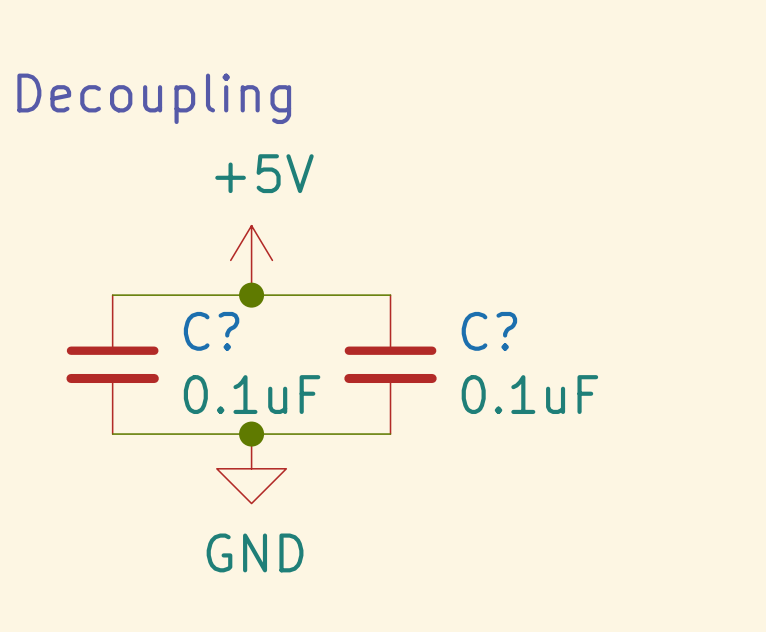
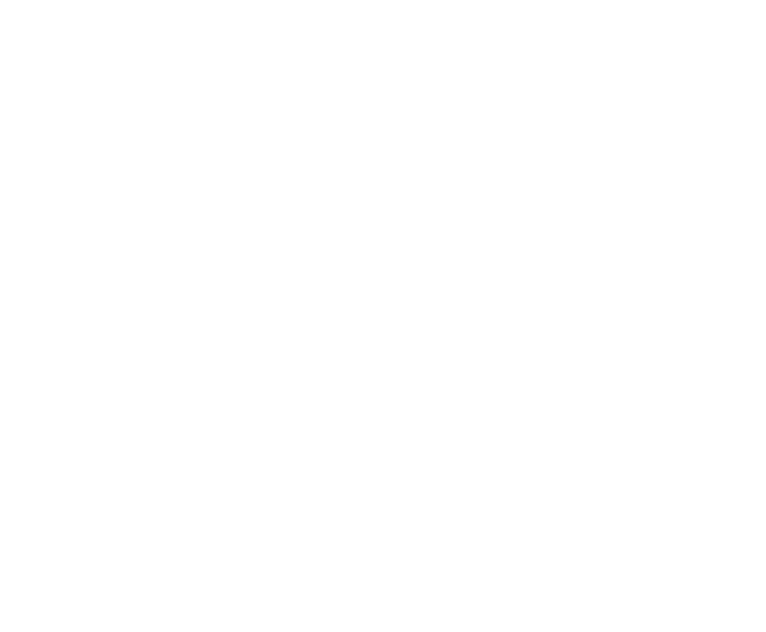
text: Decoupling (154, 98) -> none
power symbol: +5V (251, 260) -> none
wire: (112, 295) (390, 295) -> none
junction: (251, 295) -> none
C?: 0.1uF (112, 364) -> none
C?: 0.1uF (390, 364) -> none
wire: (112, 434) (390, 434) -> none
junction: (251, 434) -> none
power symbol: GND (251, 468) -> none

